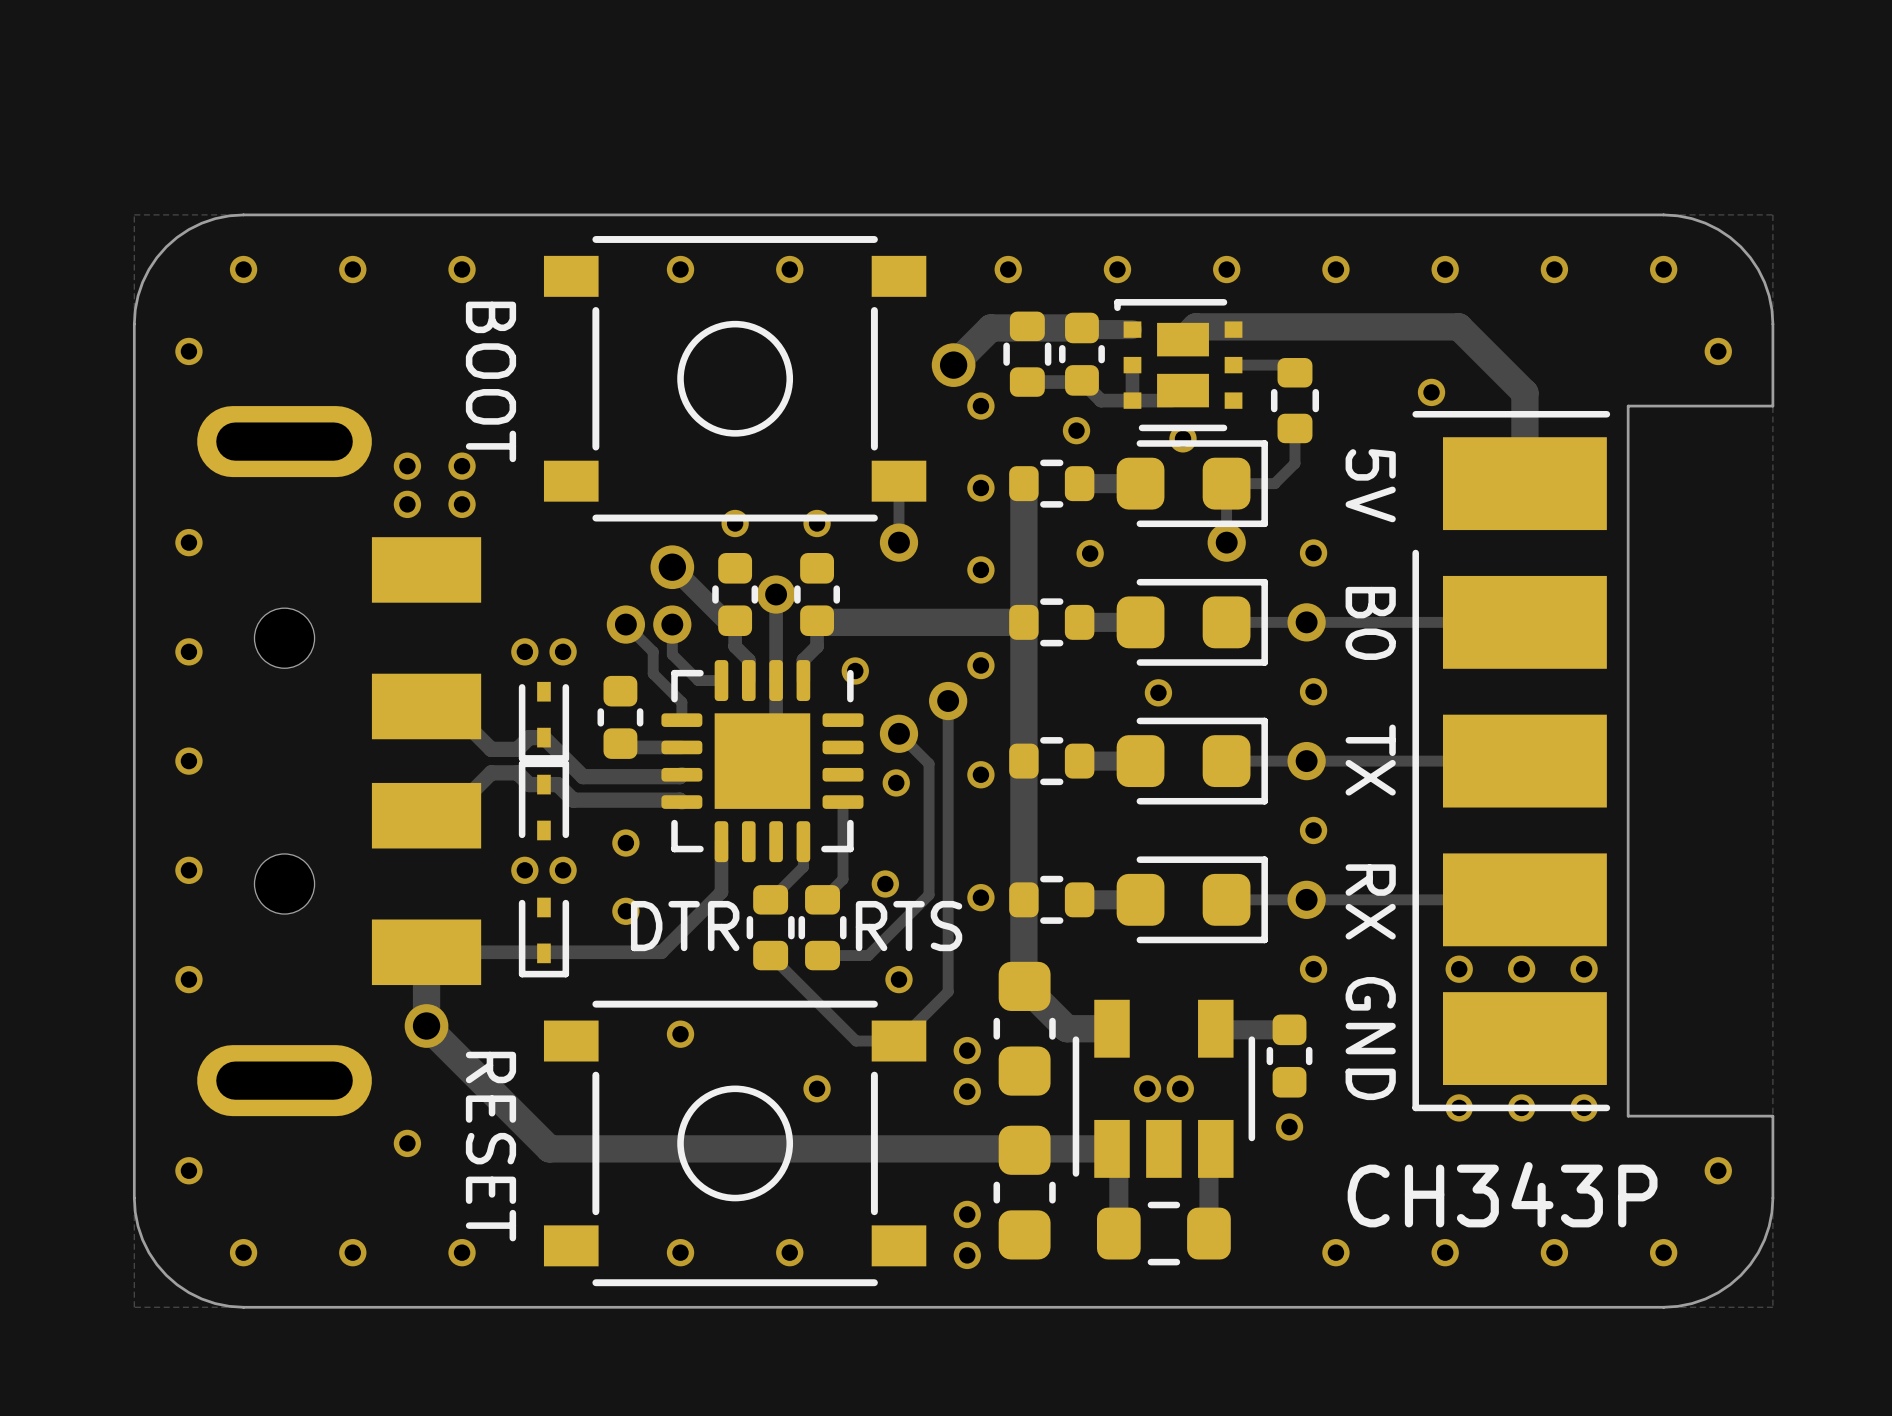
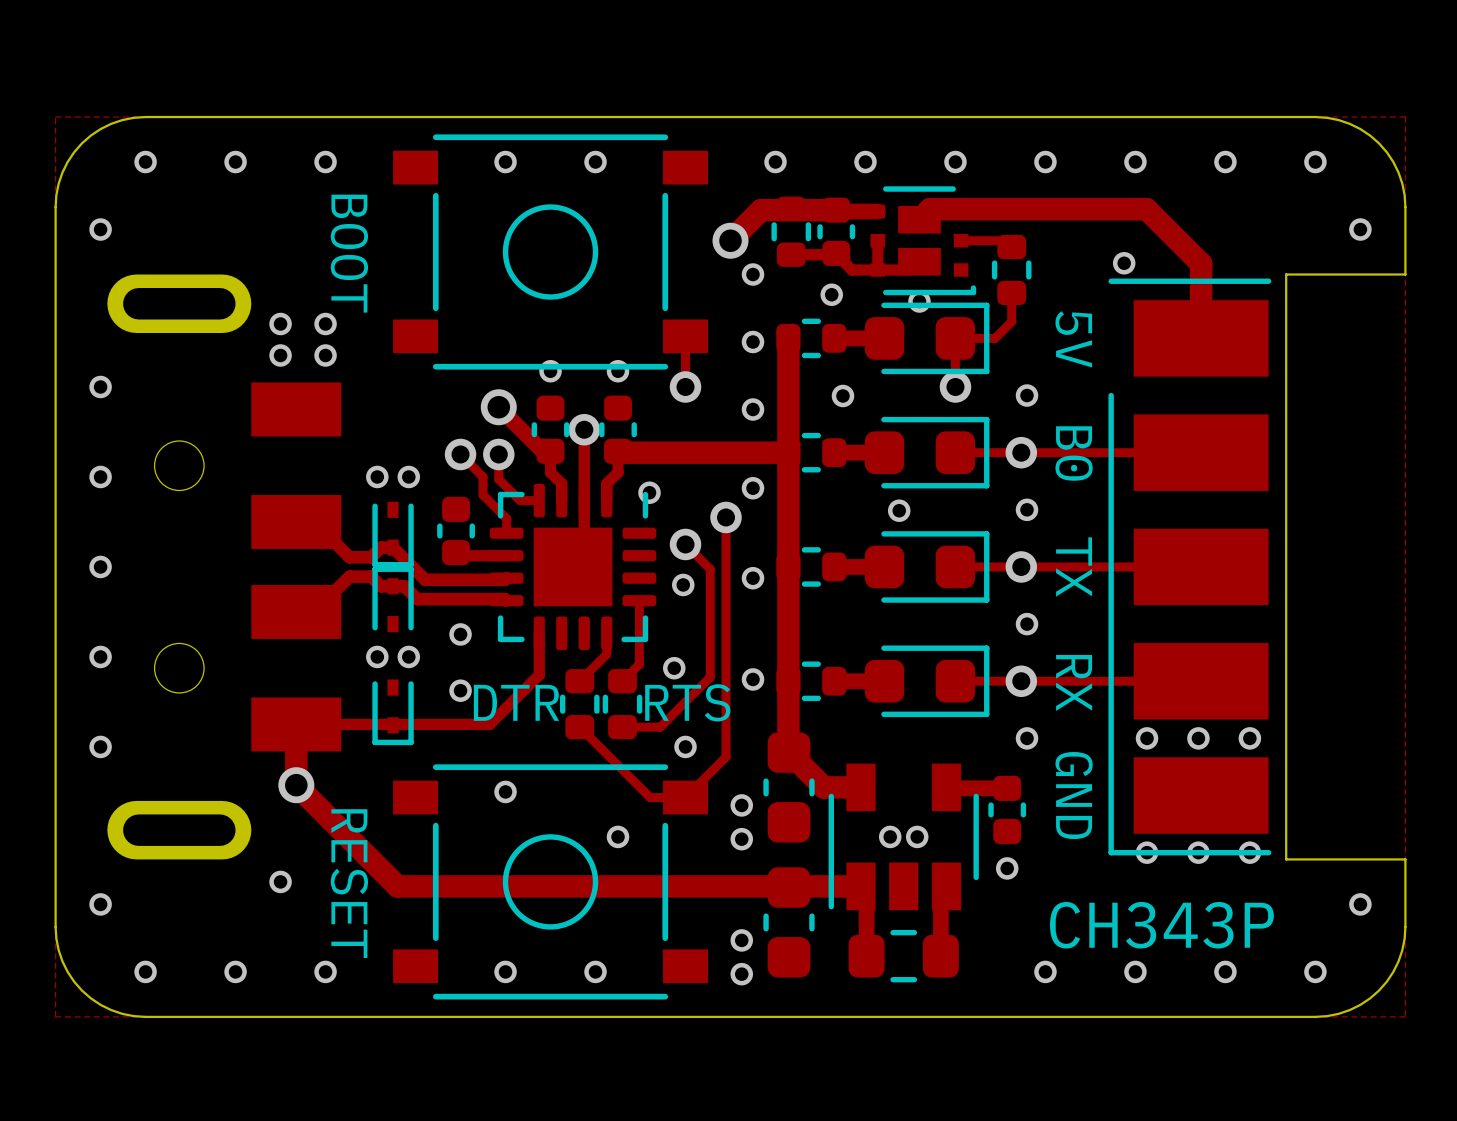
part rotation: 0° (1178, 365) -> 180° (923, 240)

